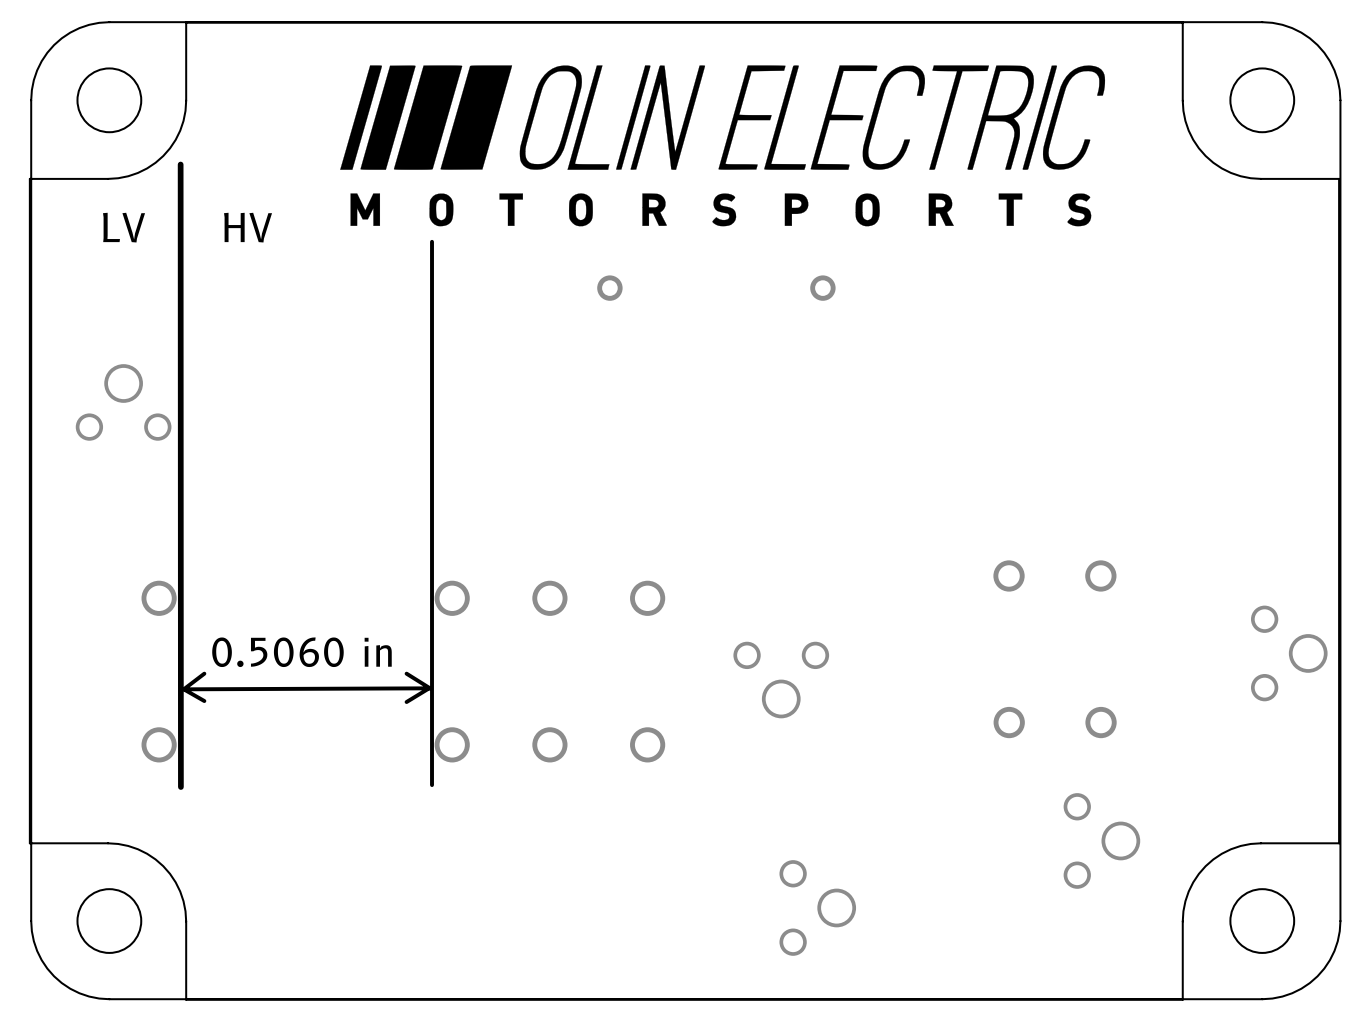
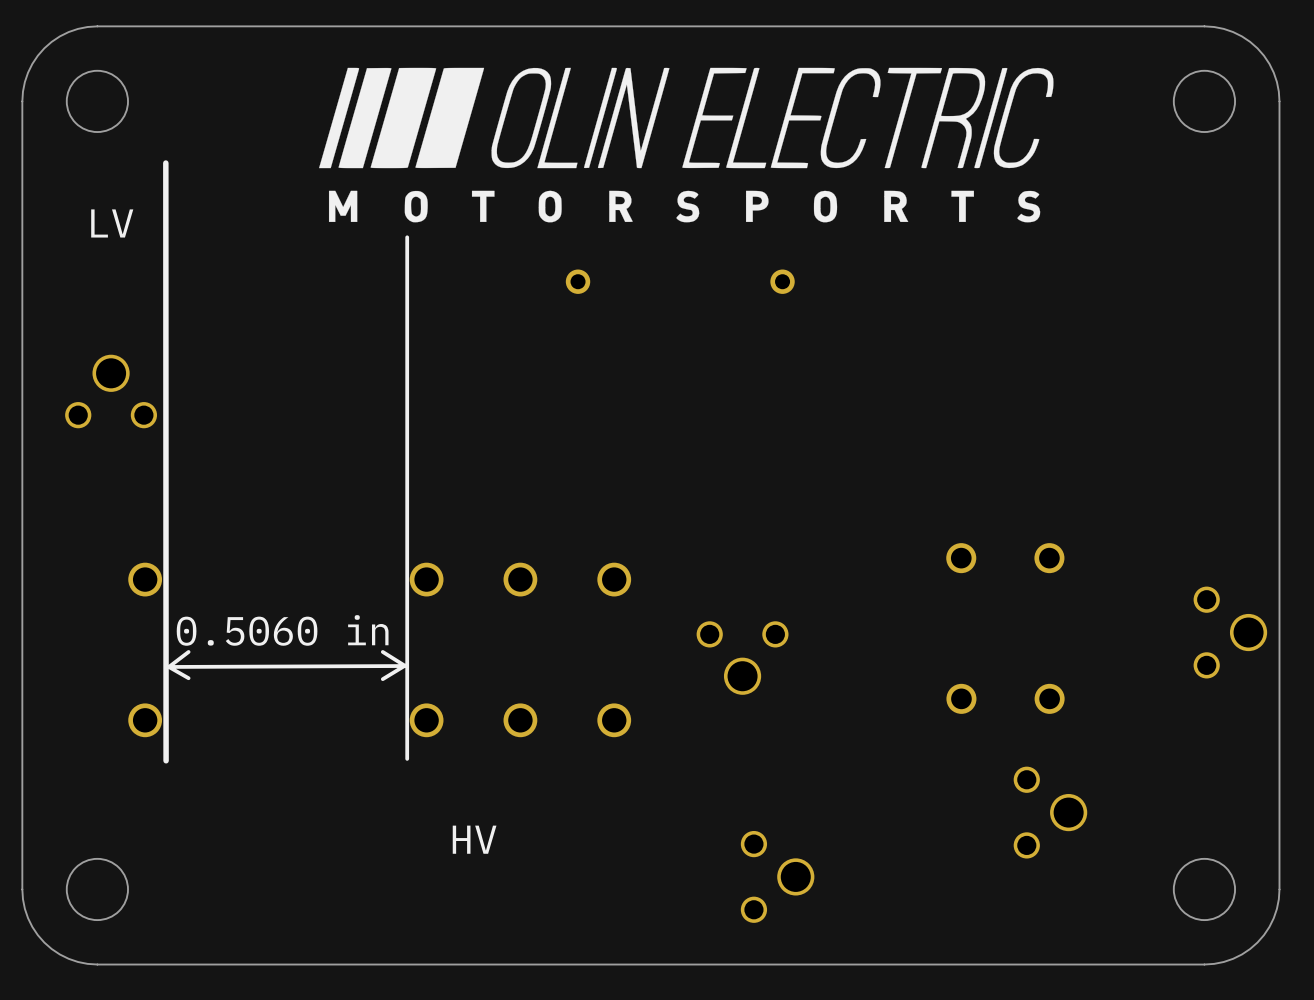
board edge: (1182, 22) (1183, 110) (1188, 130) (1205, 156) (1231, 172) (1250, 178) (1339, 178) (1339, 843) (1250, 843) (1231, 849) (1205, 866) (1188, 891) (1183, 911) (1182, 999) (186, 999) (185, 911) (175, 882) (163, 866) (137, 849) (118, 843) (29, 843) (29, 178) (118, 178) (137, 172) (163, 156) (175, 139) (185, 110) (186, 22) (1182, 22) -> none
text: HV (248, 227) -> none
text: none -> HV (474, 839)

